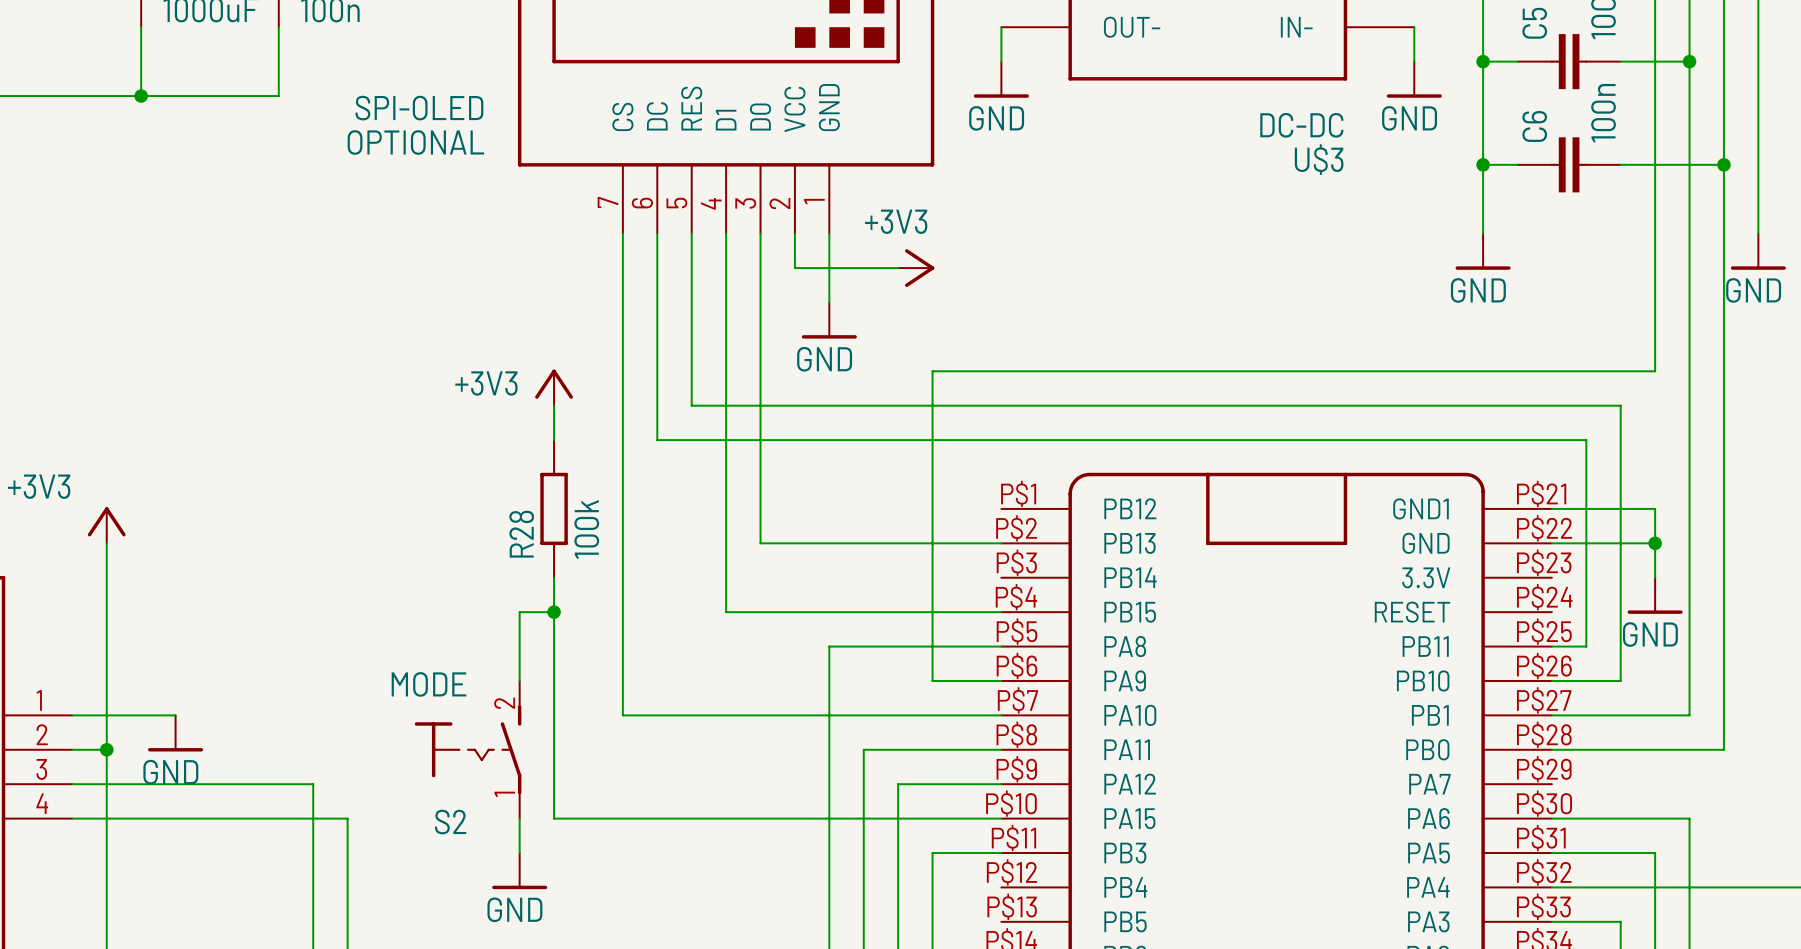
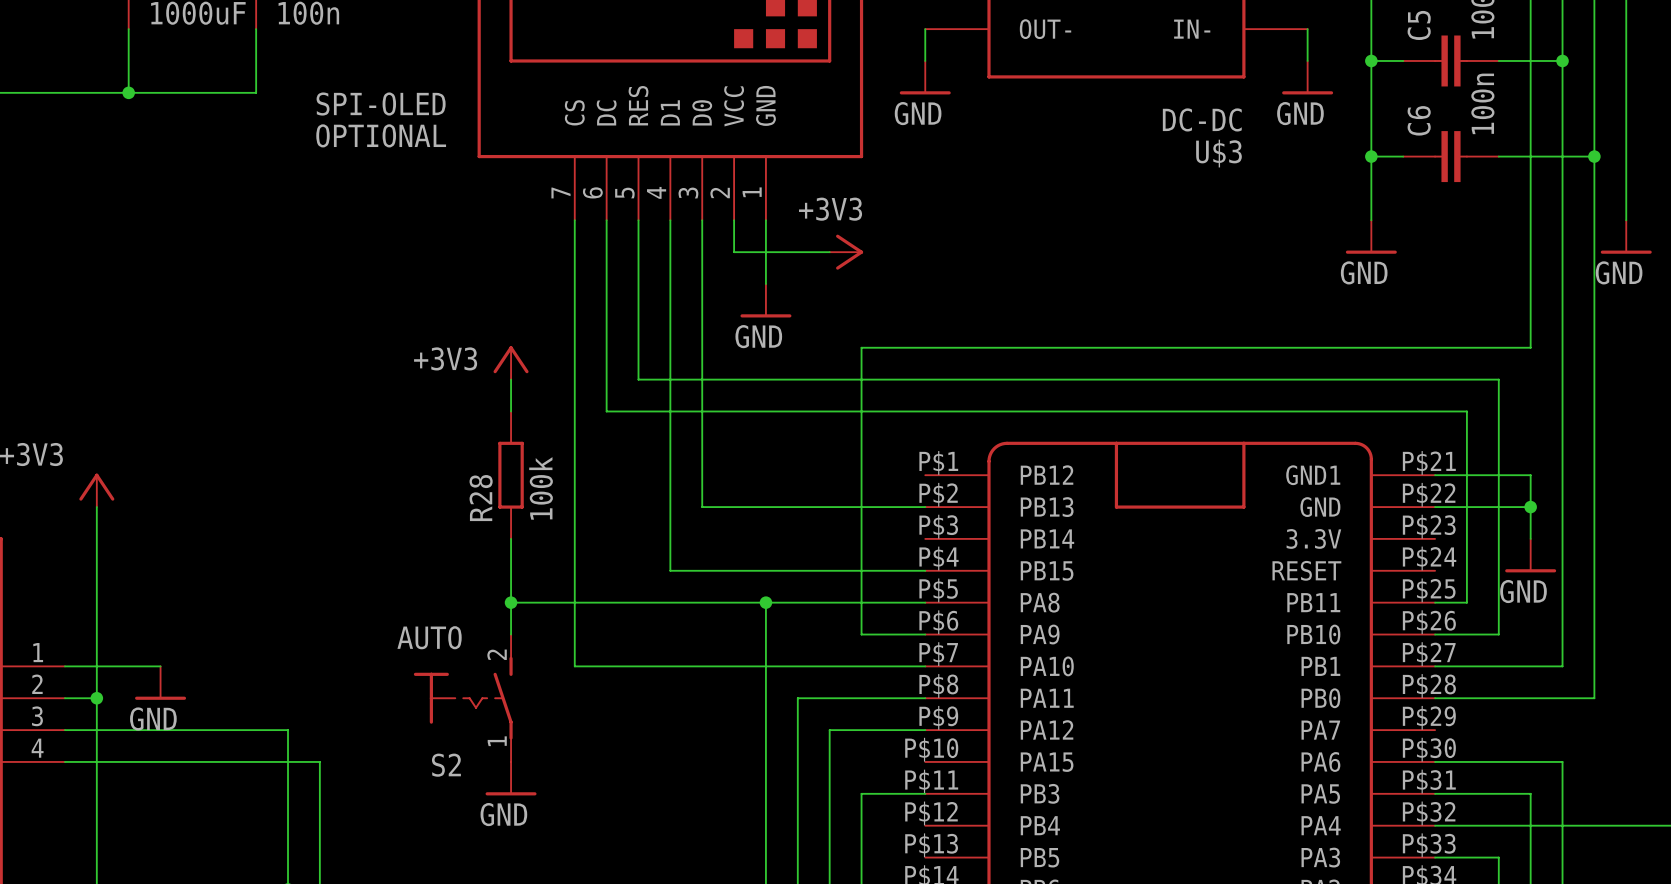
wire: (554, 612) (519, 612) (519, 680) -> none
junction position: (554, 612) -> (511, 602)
wire: none -> (511, 602) (765, 602)
junction: none -> (765, 602)
wire: (554, 680) (554, 818) (1001, 818) -> none
S2 value: MODE (428, 684) -> AUTO (429, 637)
S2 position: (468, 749) -> (463, 698)
wire: (519, 818) (519, 853) -> none
power symbol position: GND (519, 871) -> GND (511, 778)

